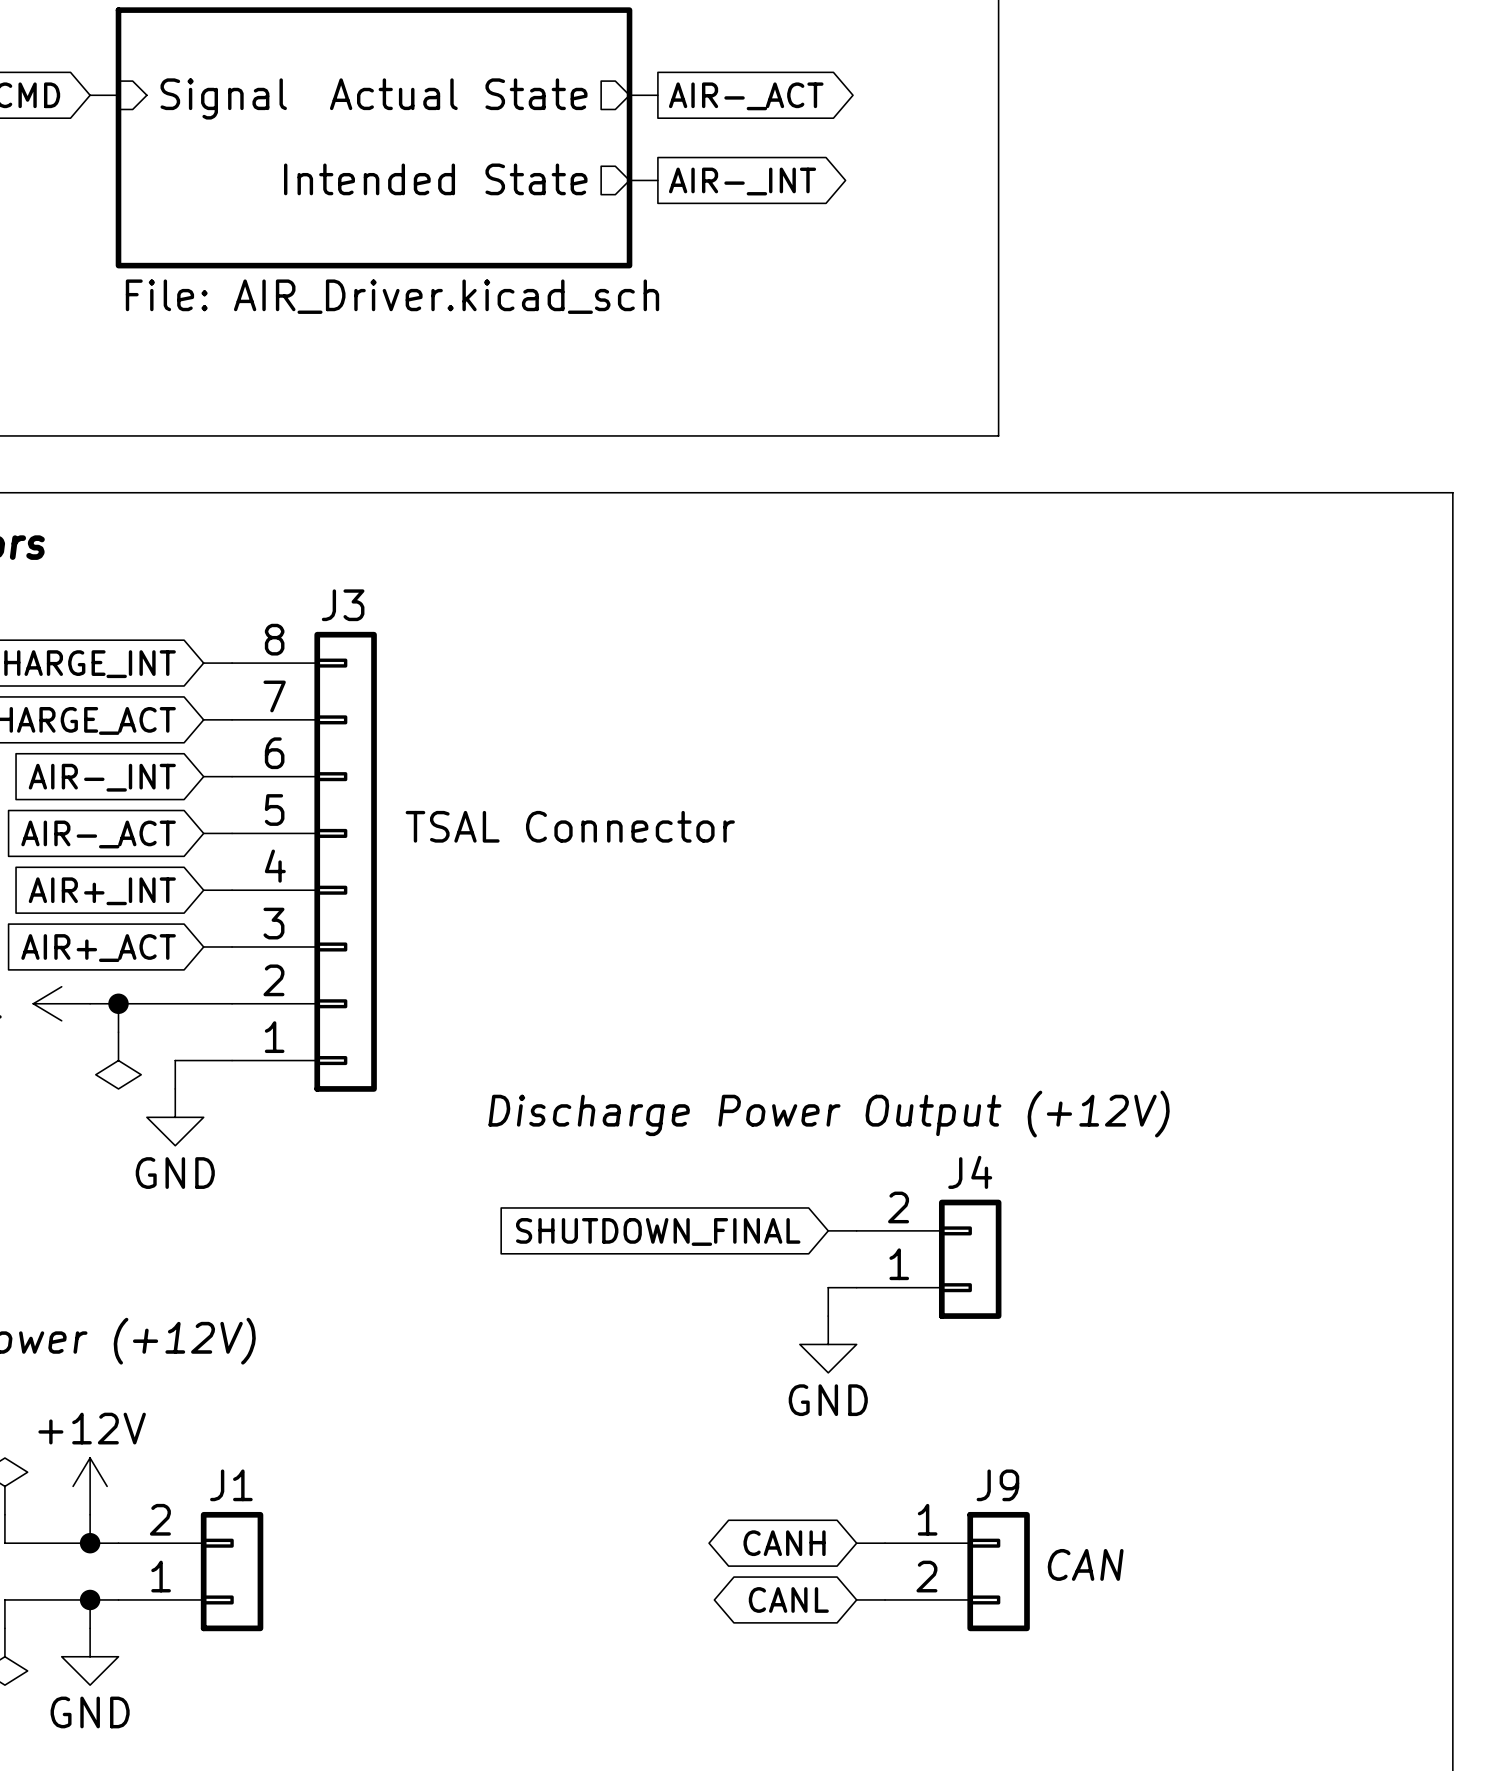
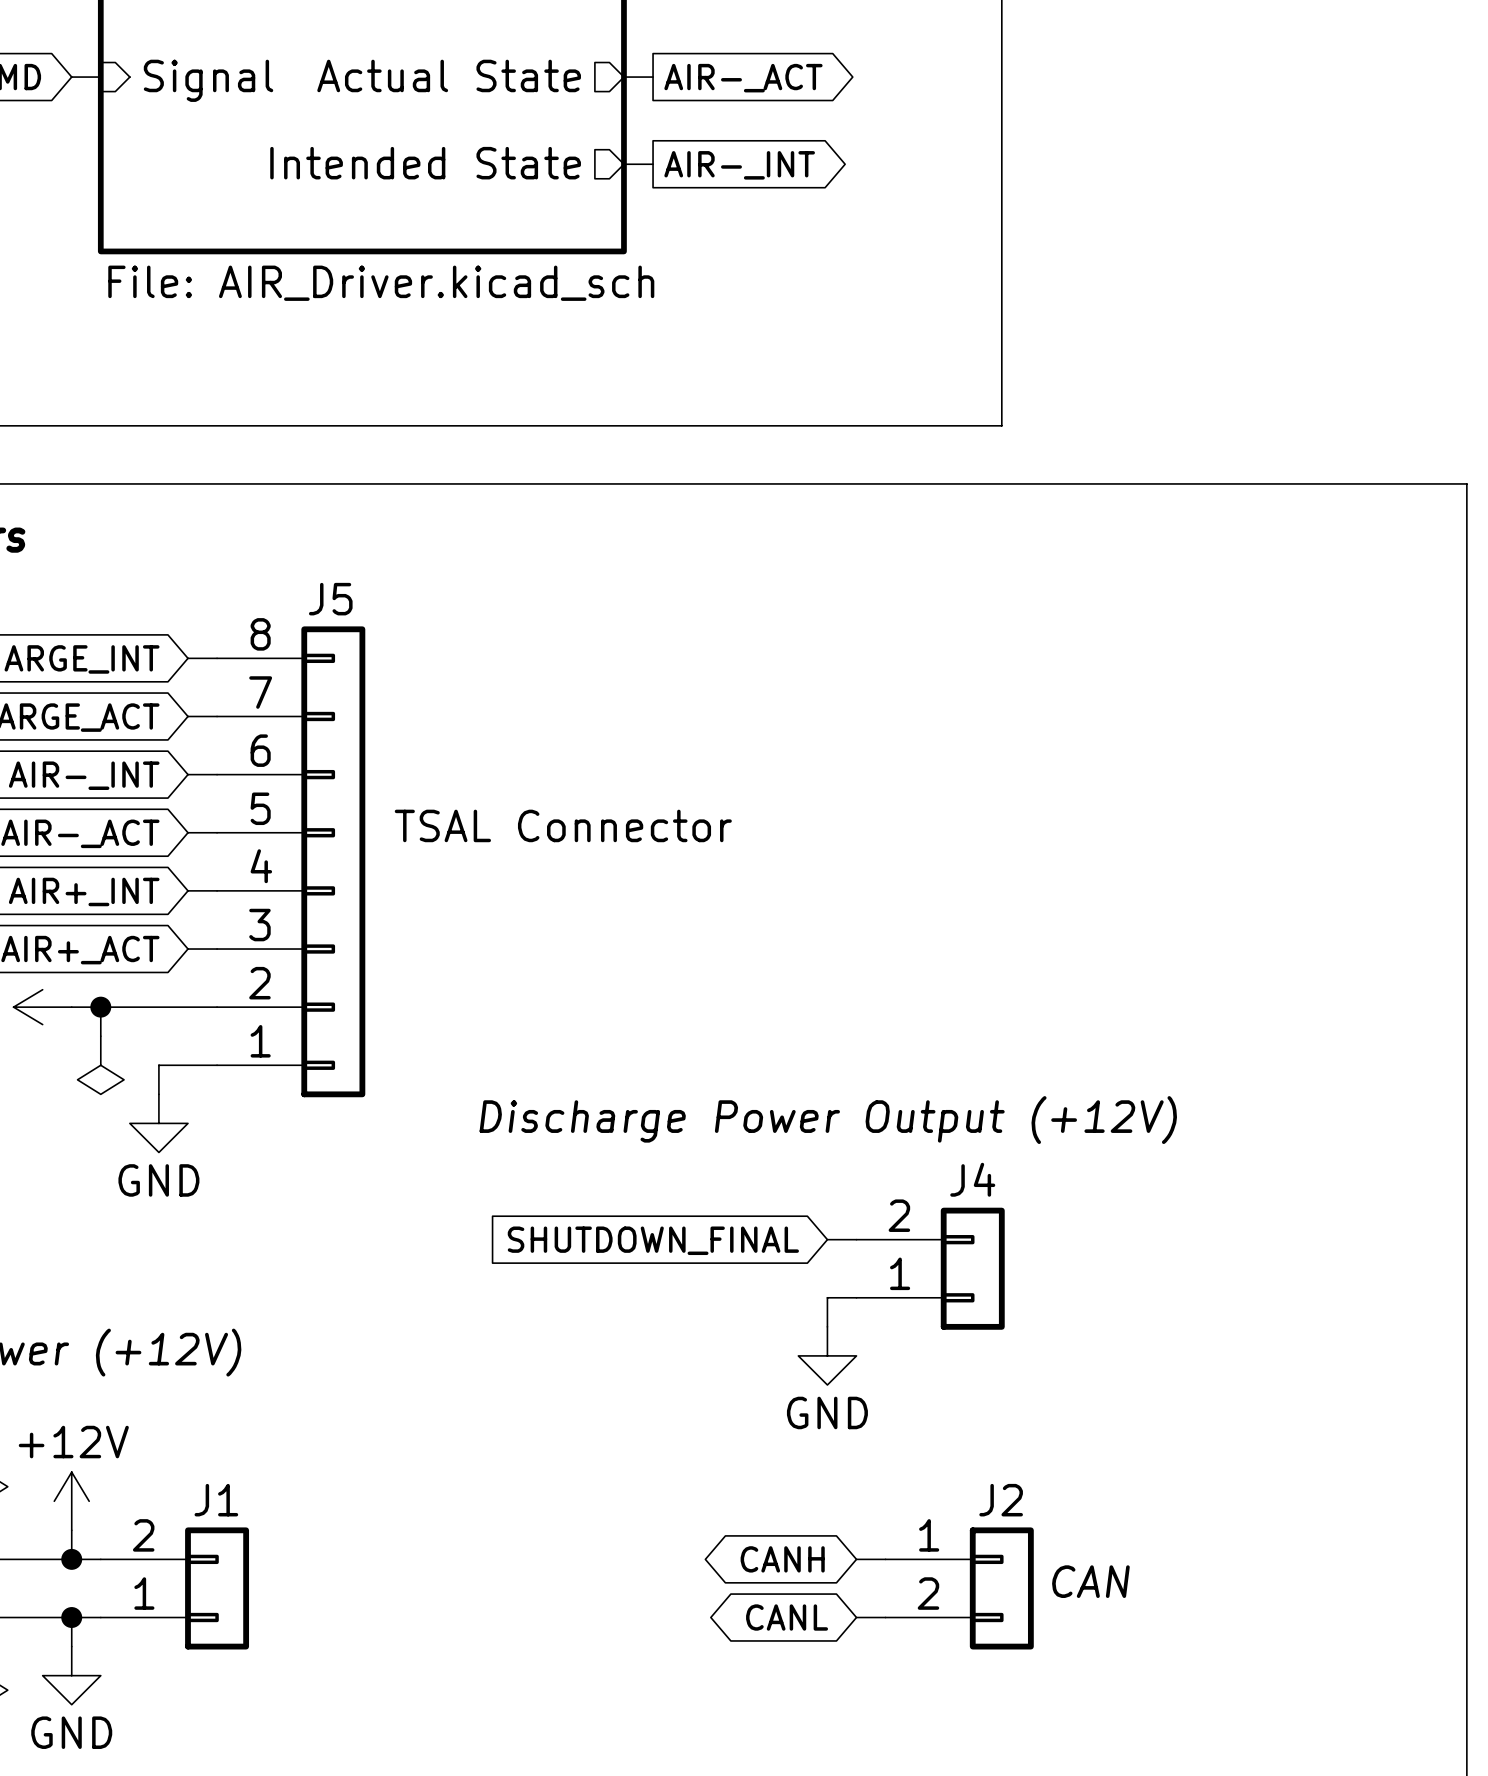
J3 name: J3 (343, 605) -> J5 (330, 599)
J9 name: J9 (997, 1485) -> J2 (1001, 1500)

